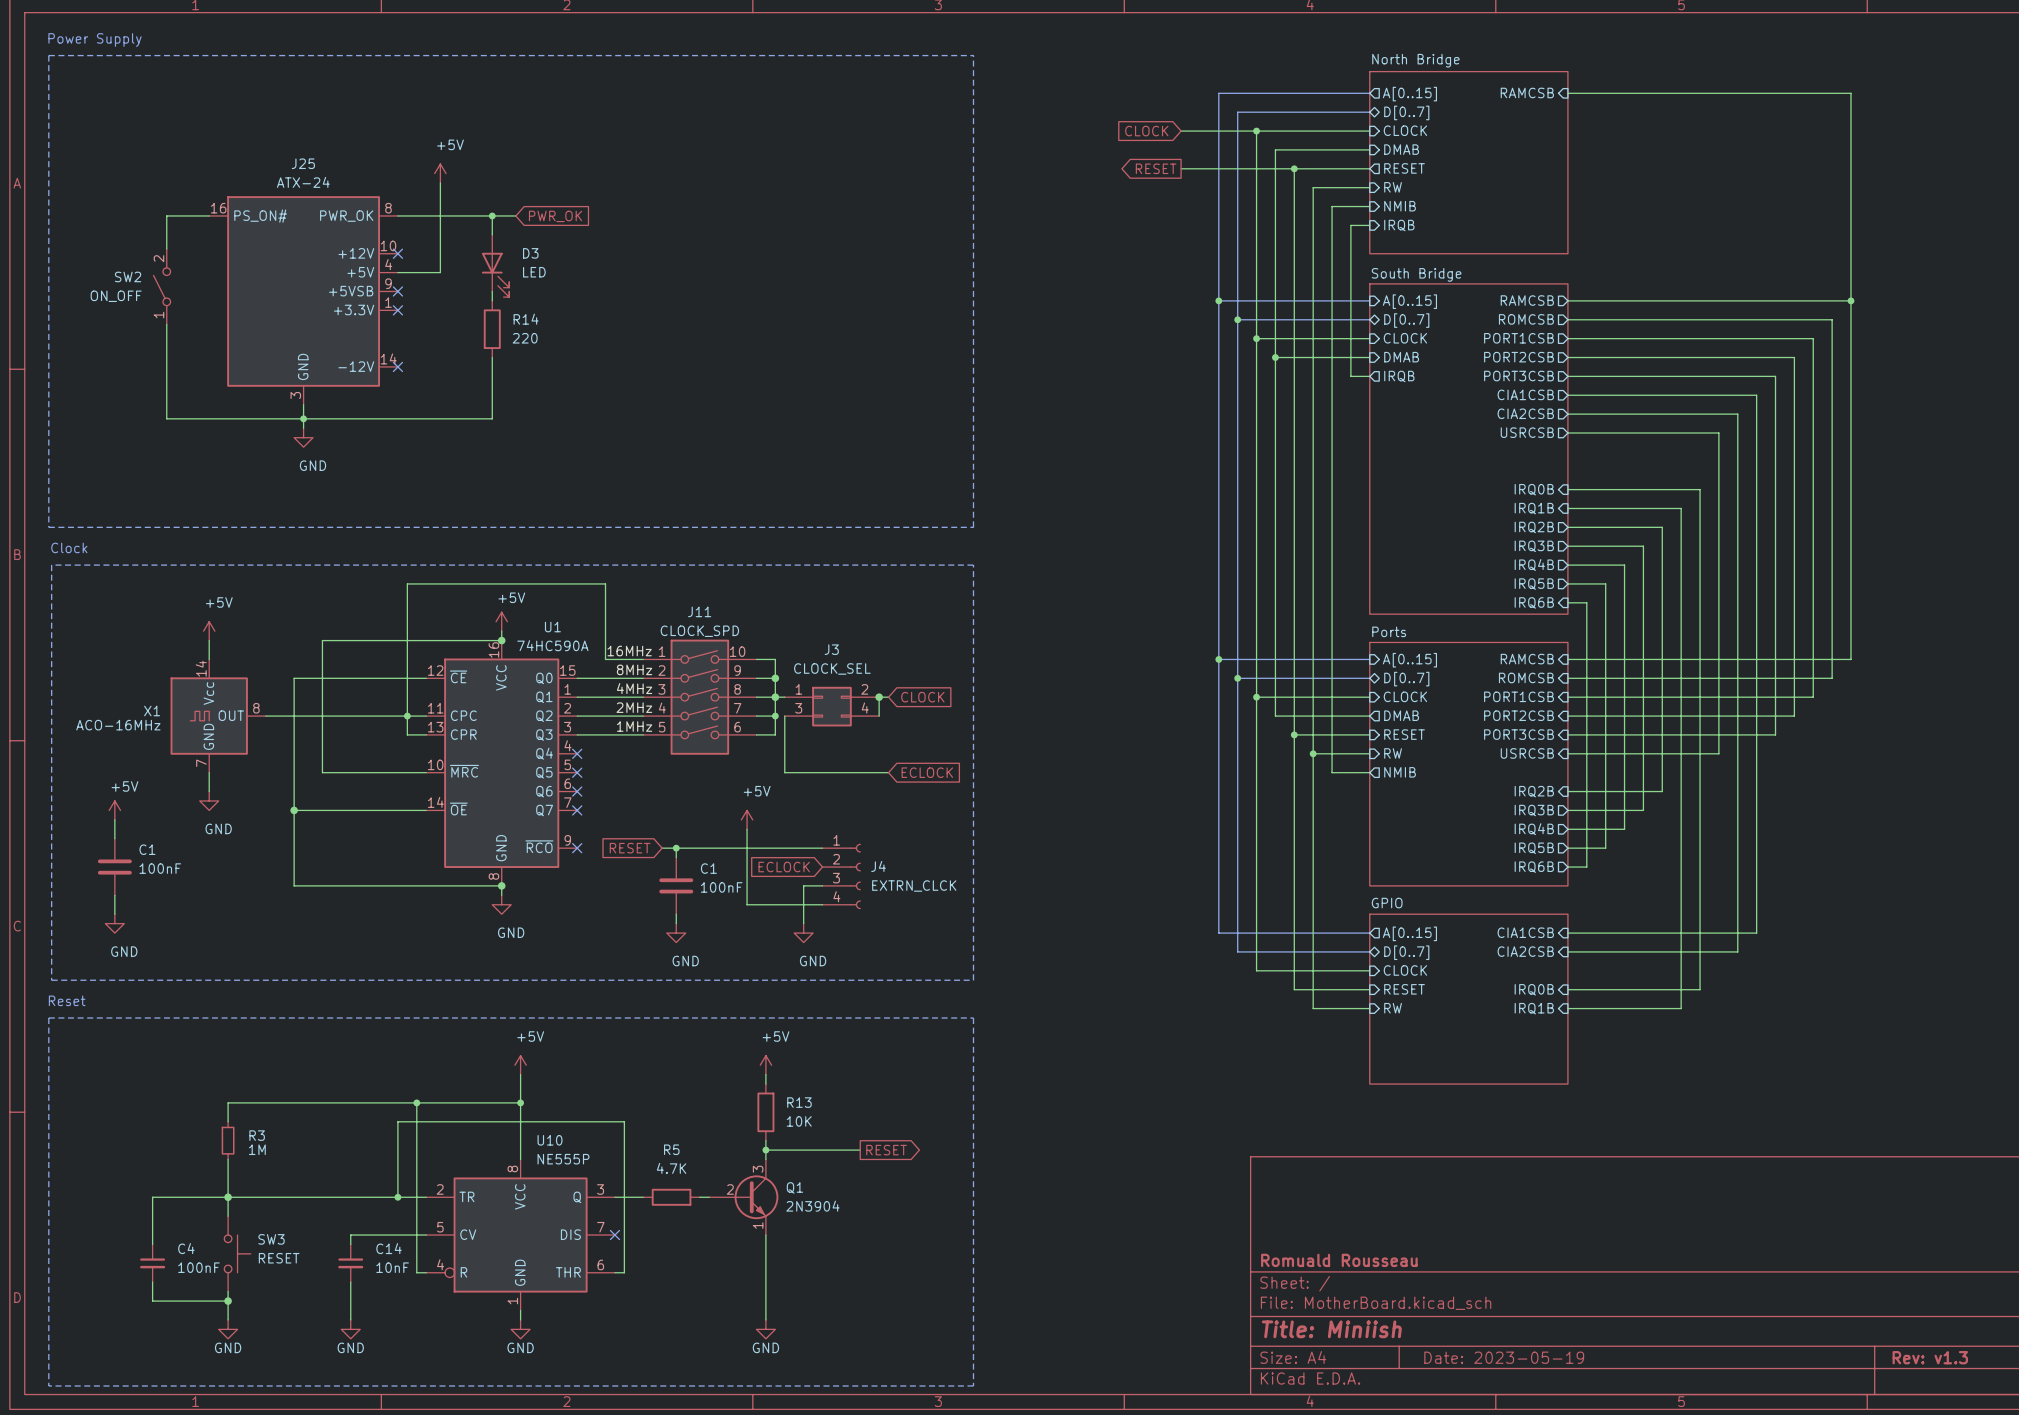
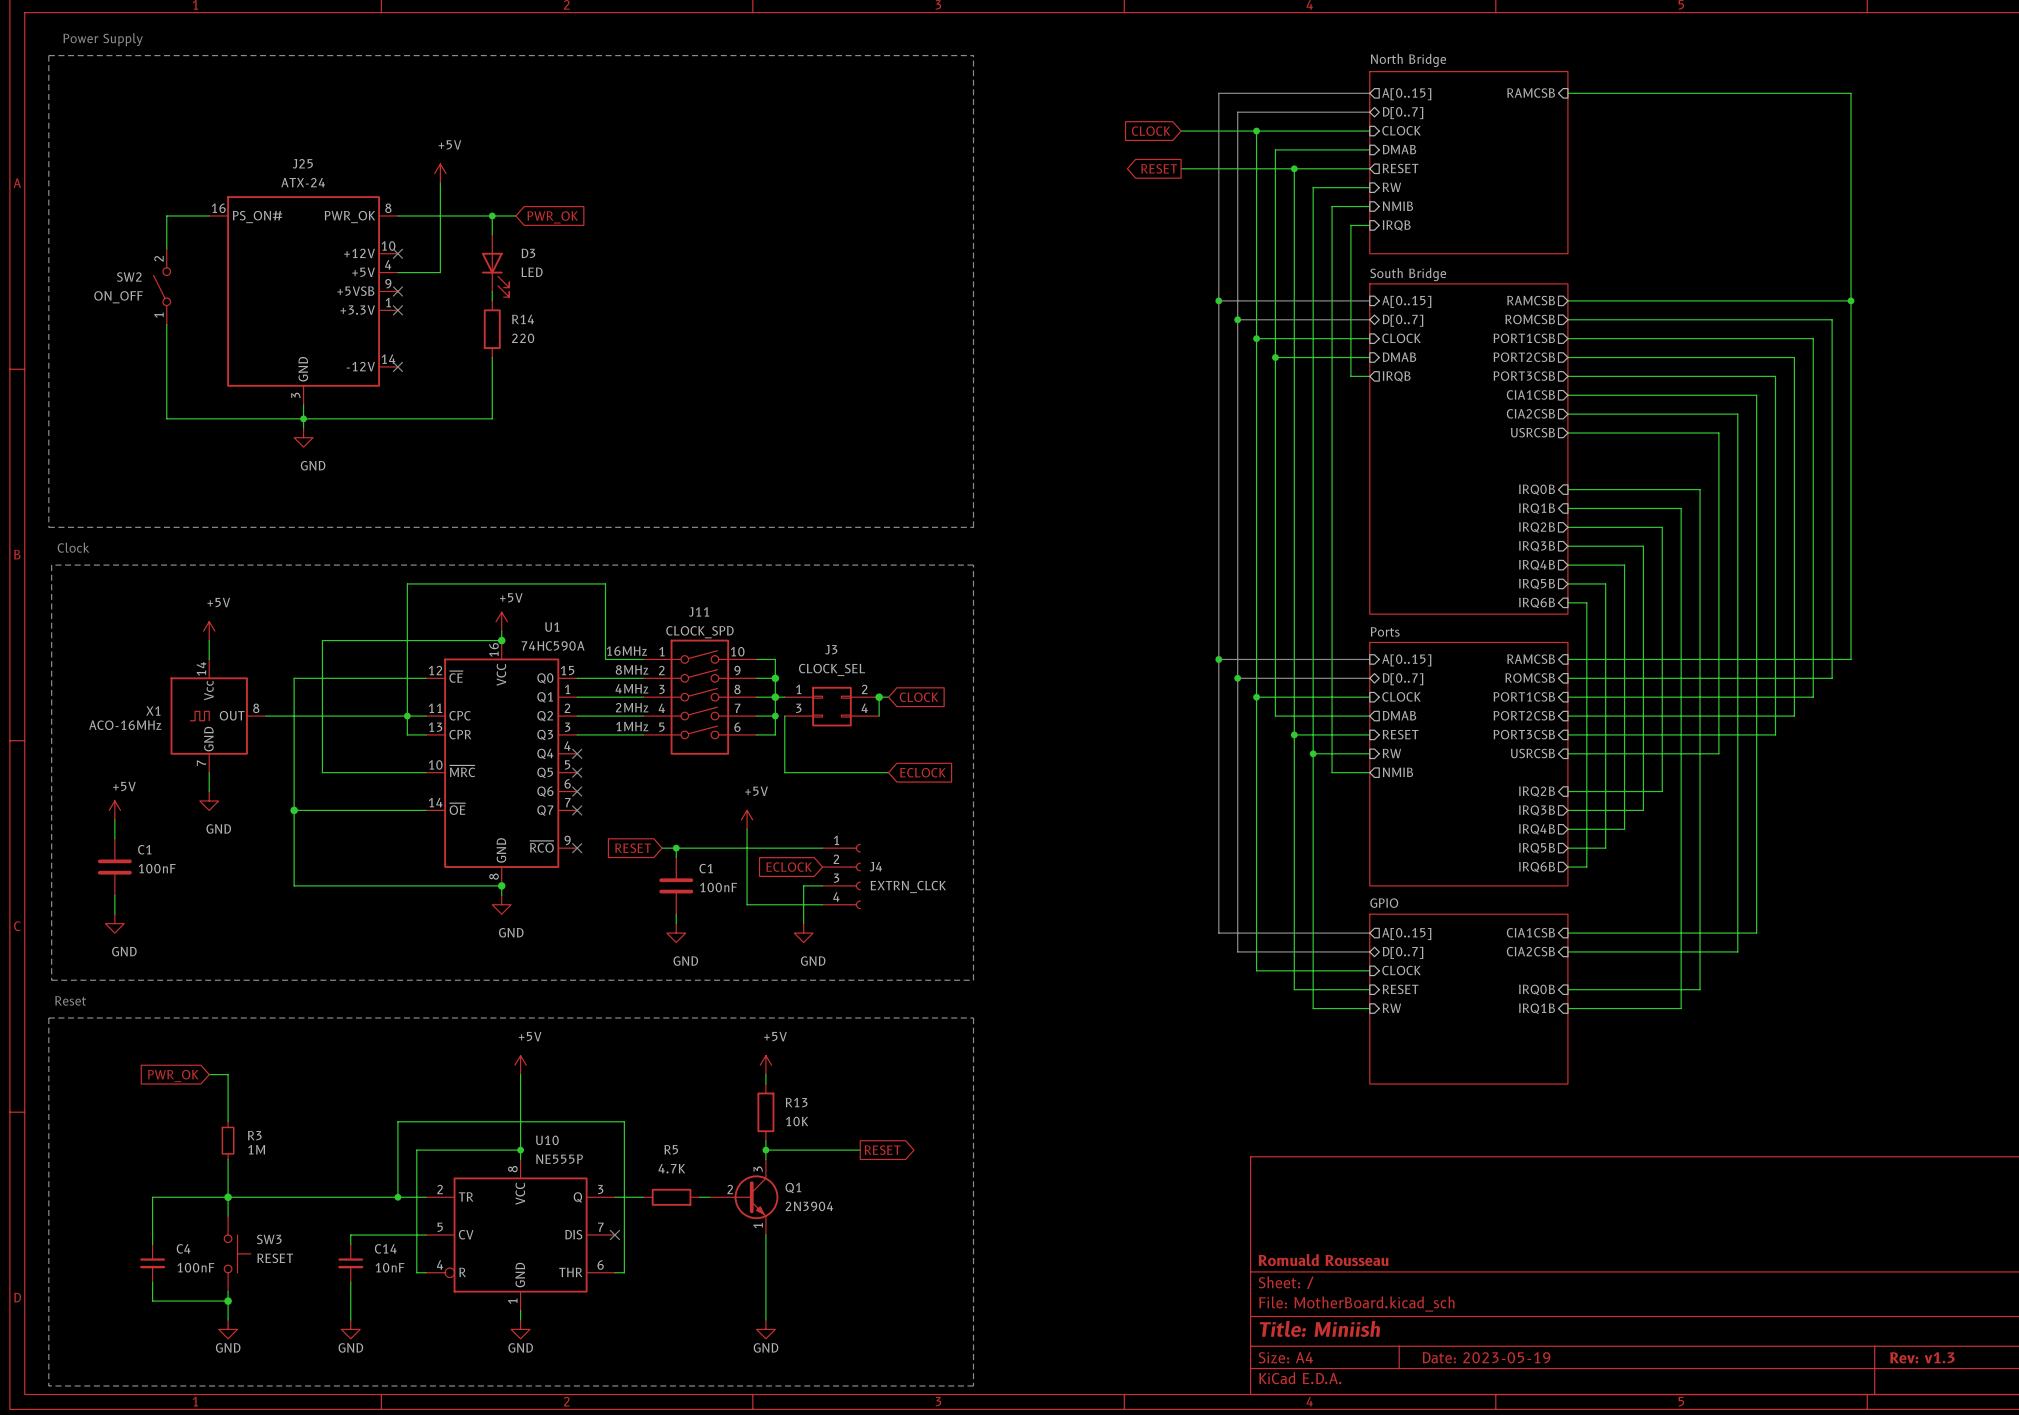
global label: none -> PWR_OK (173, 1076)
wire: (228, 1102) (520, 1102) -> (228, 1102) (228, 1074) (209, 1074)
wire: (416, 1102) (416, 1150) -> (520, 1150) (416, 1150)
junction: (416, 1102) -> none
junction: (520, 1102) -> none
junction: none -> (520, 1150)

